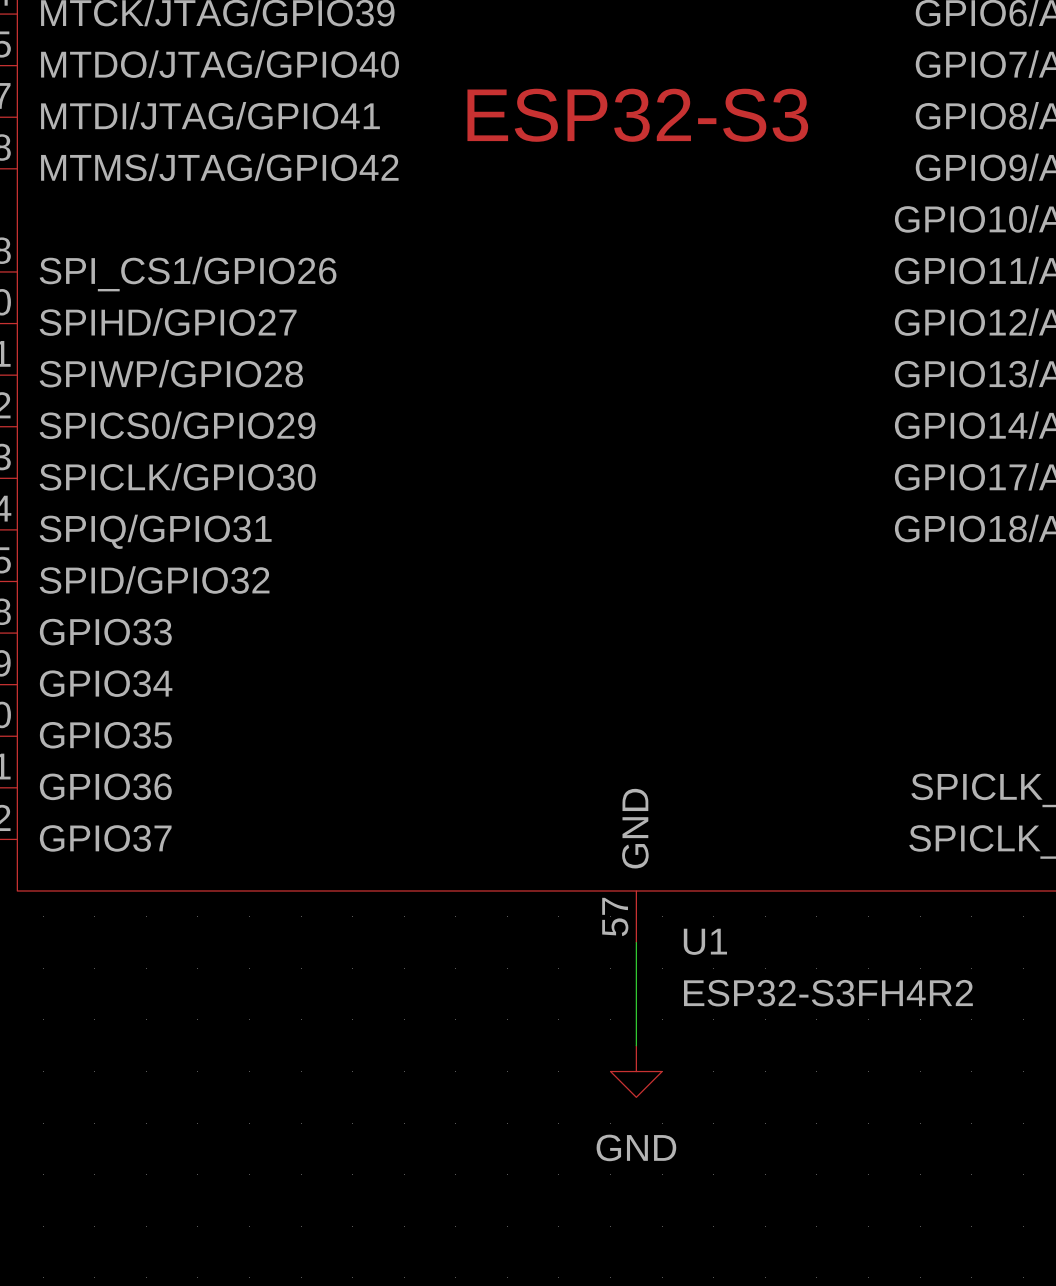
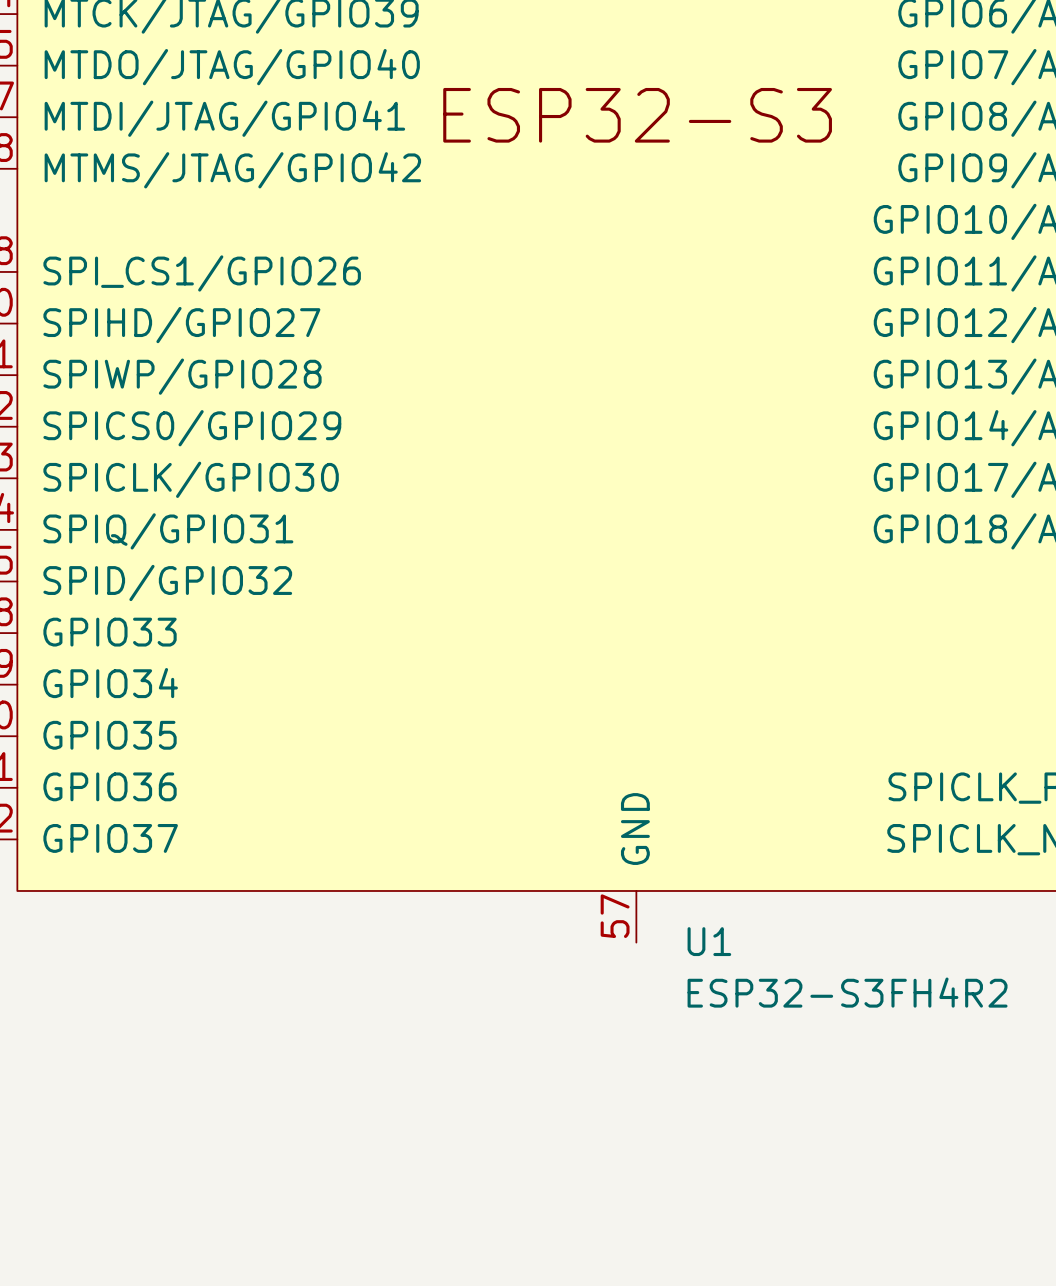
wire: (636, 942) (636, 1045) -> none
power symbol: GND (636, 1071) -> none

